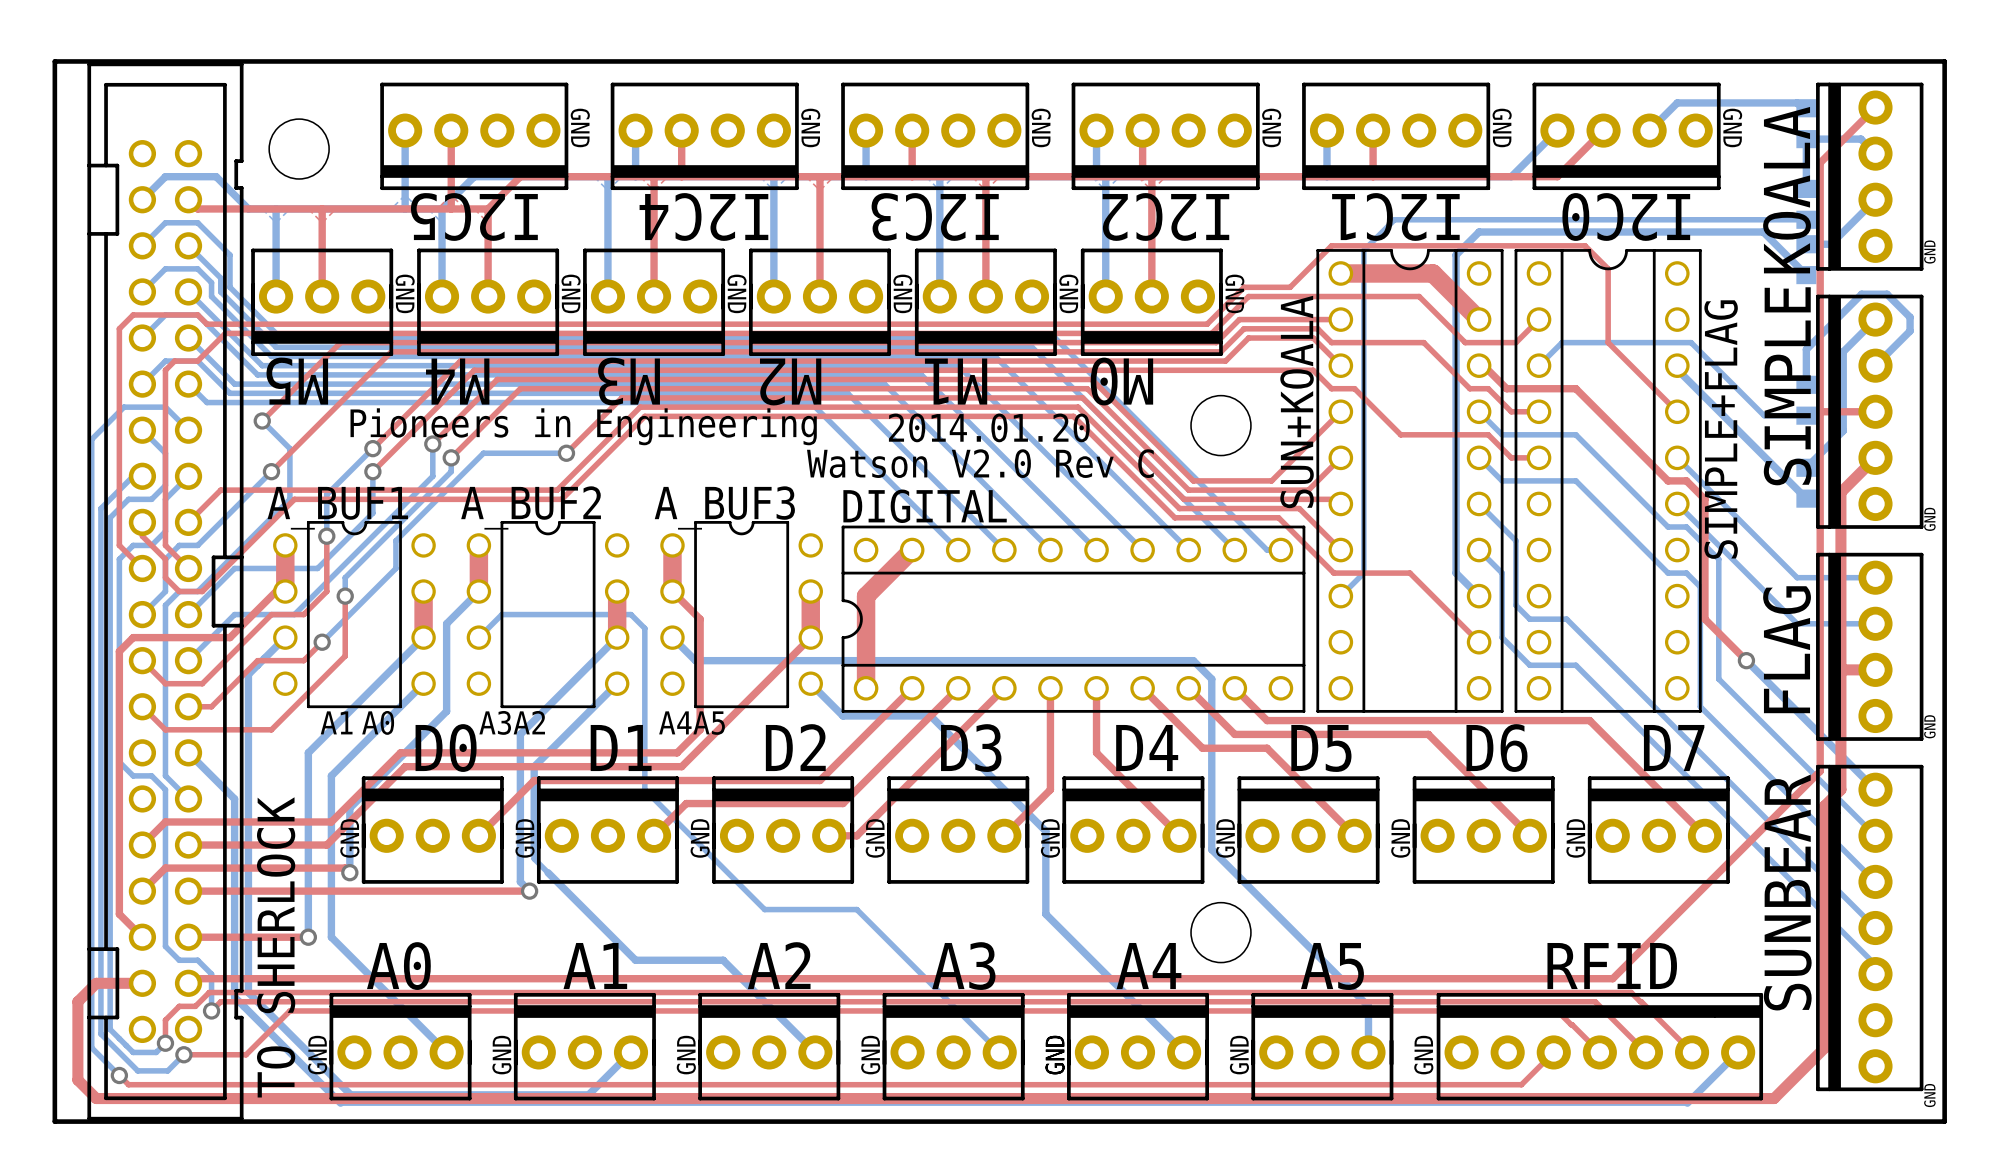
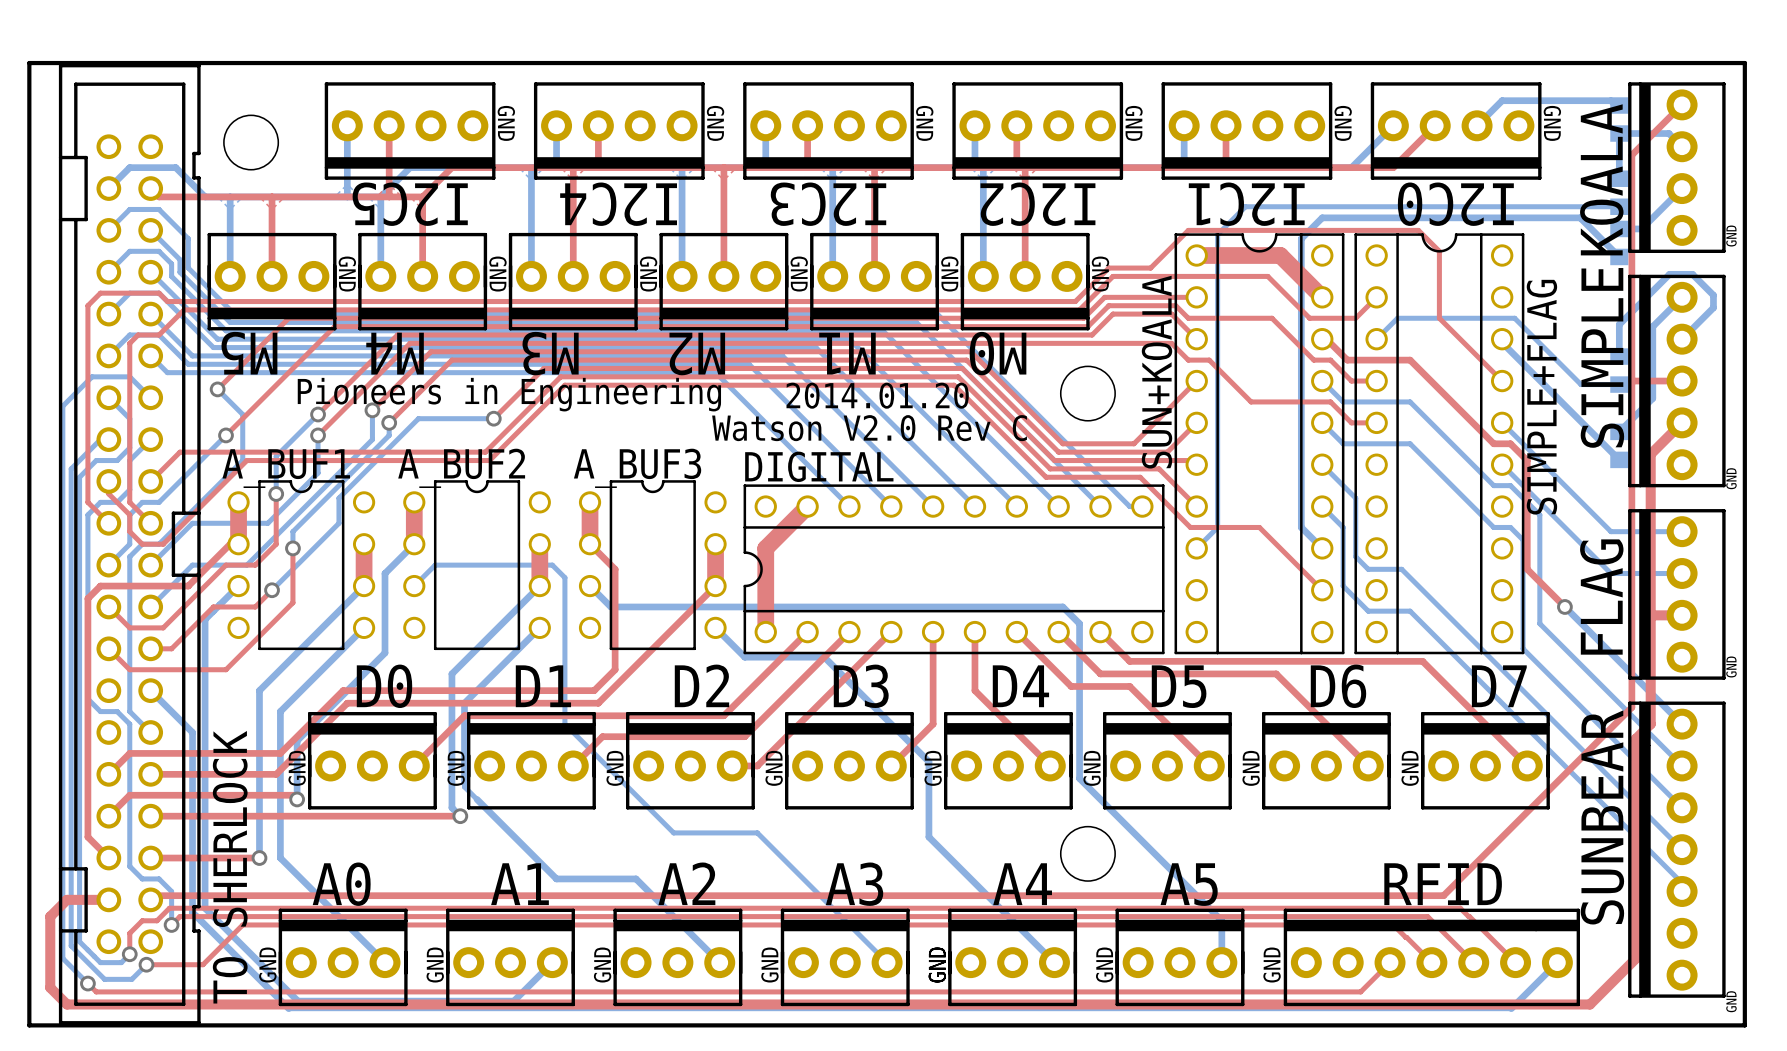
text: A1 (336, 722) -> none
text: A0 (378, 722) -> none
text: A3A2 (512, 722) -> none
text: A4A5 (692, 723) -> none

